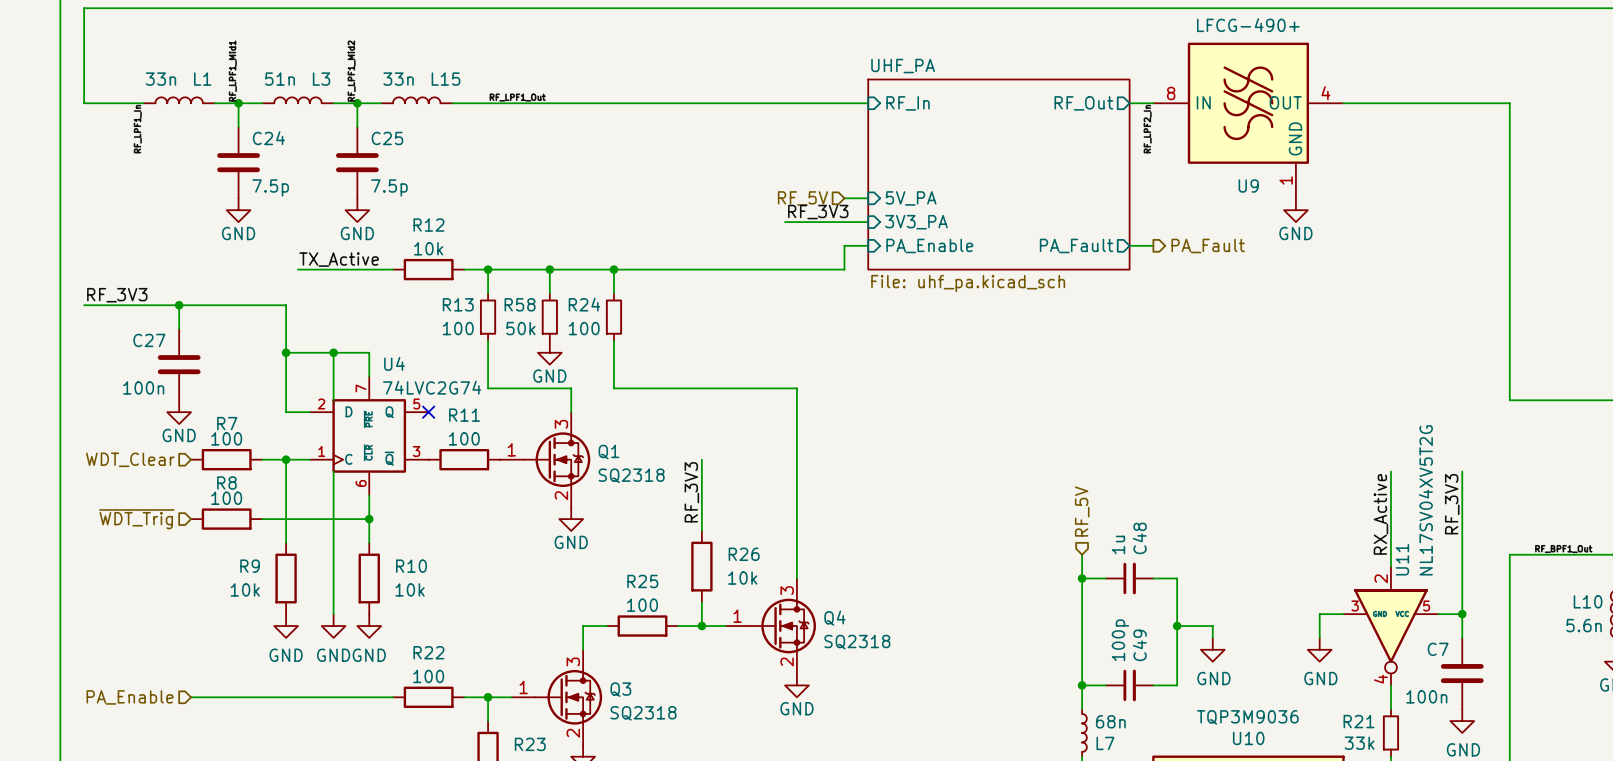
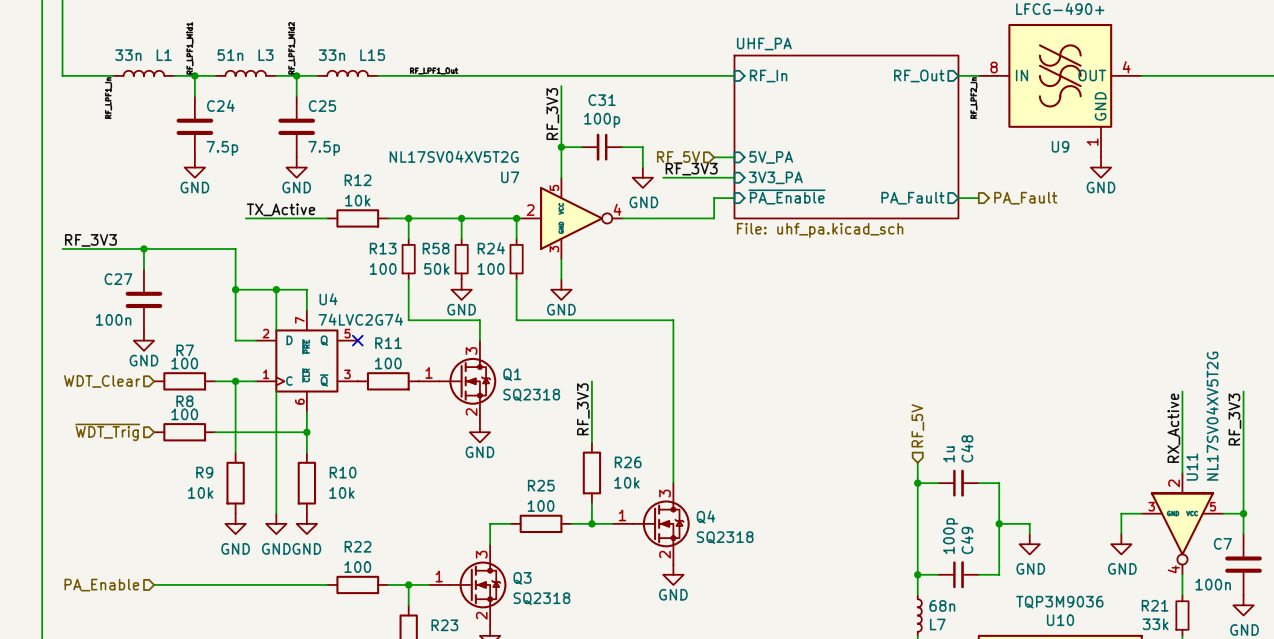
wire: none -> (561, 86) (561, 177)
label: none -> RF_3V3 (552, 114)
wire: none -> (561, 147) (581, 147)
junction: none -> (561, 147)
C31: none -> 100p (602, 147)
wire: none -> (622, 147) (642, 147) (642, 167)
power symbol: none -> GND (642, 177)
sheet pin: PA_Enable (929, 245) -> ~{PA_Enable} (787, 197)
U7: none -> NL17SV04XV5T2G (571, 218)
wire: none -> (561, 259) (561, 279)
power symbol: none -> GND (561, 289)

